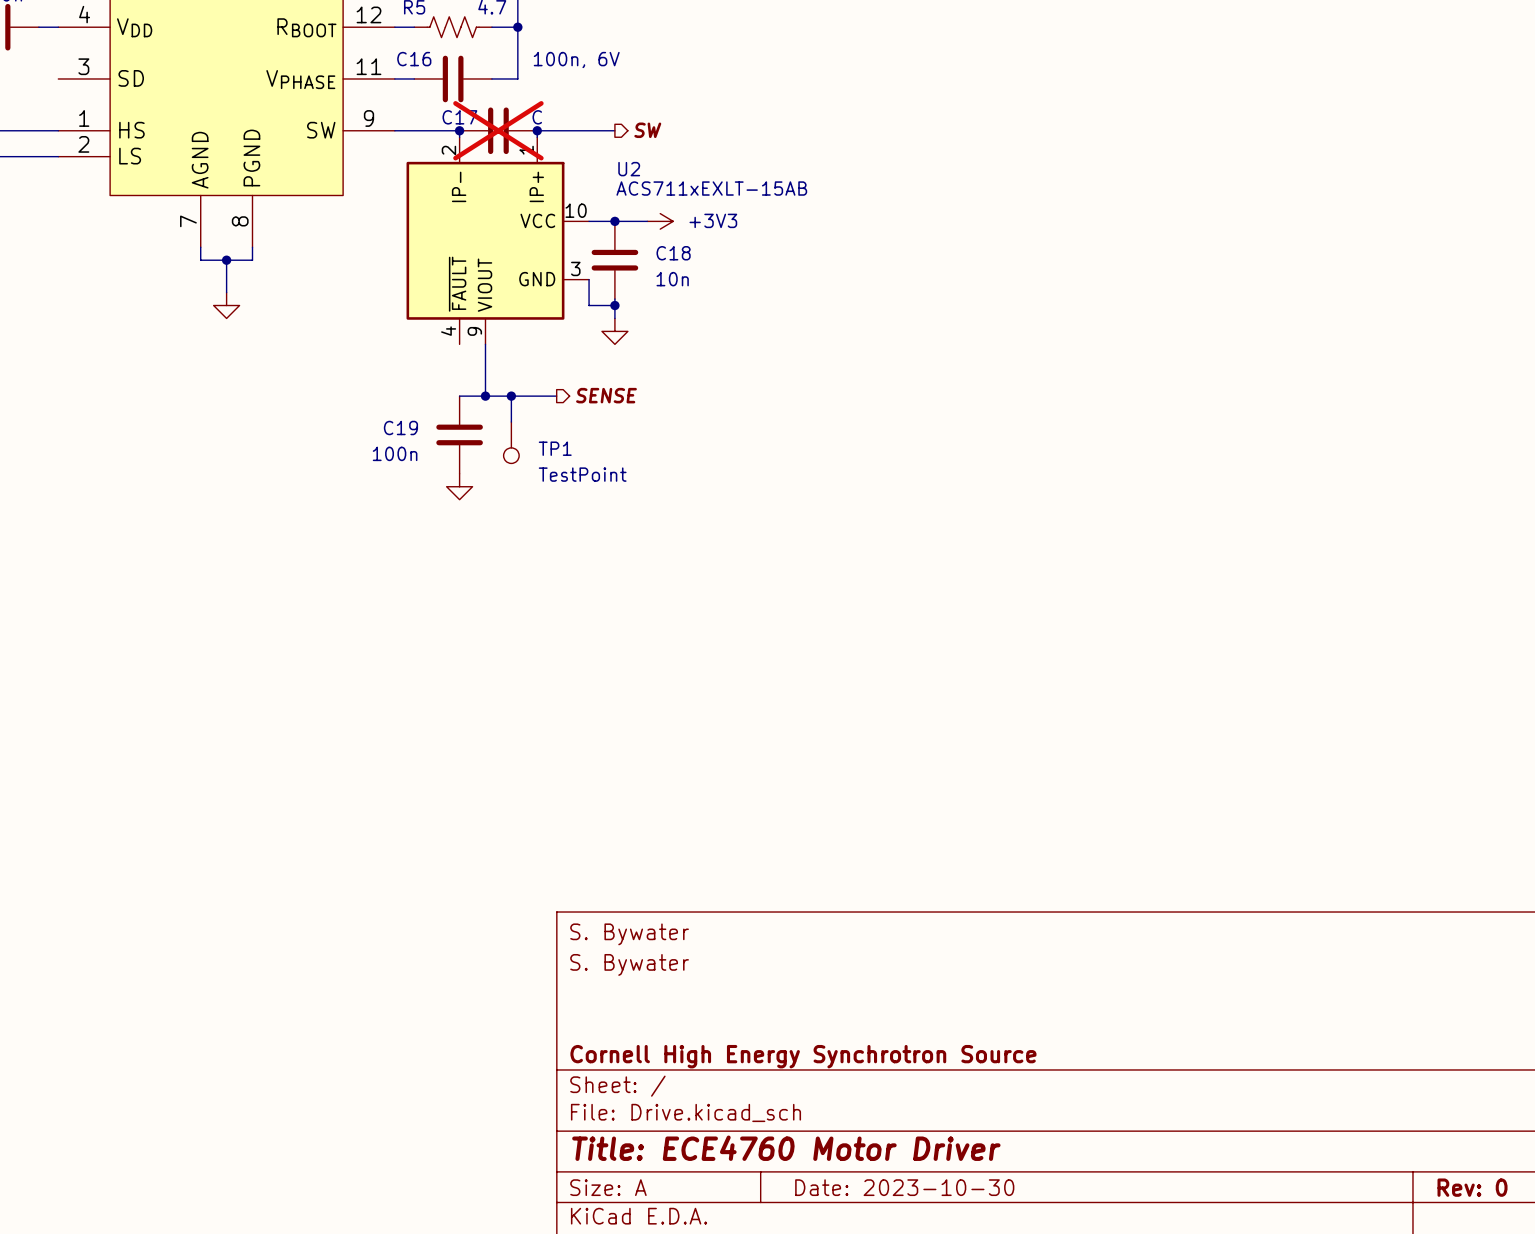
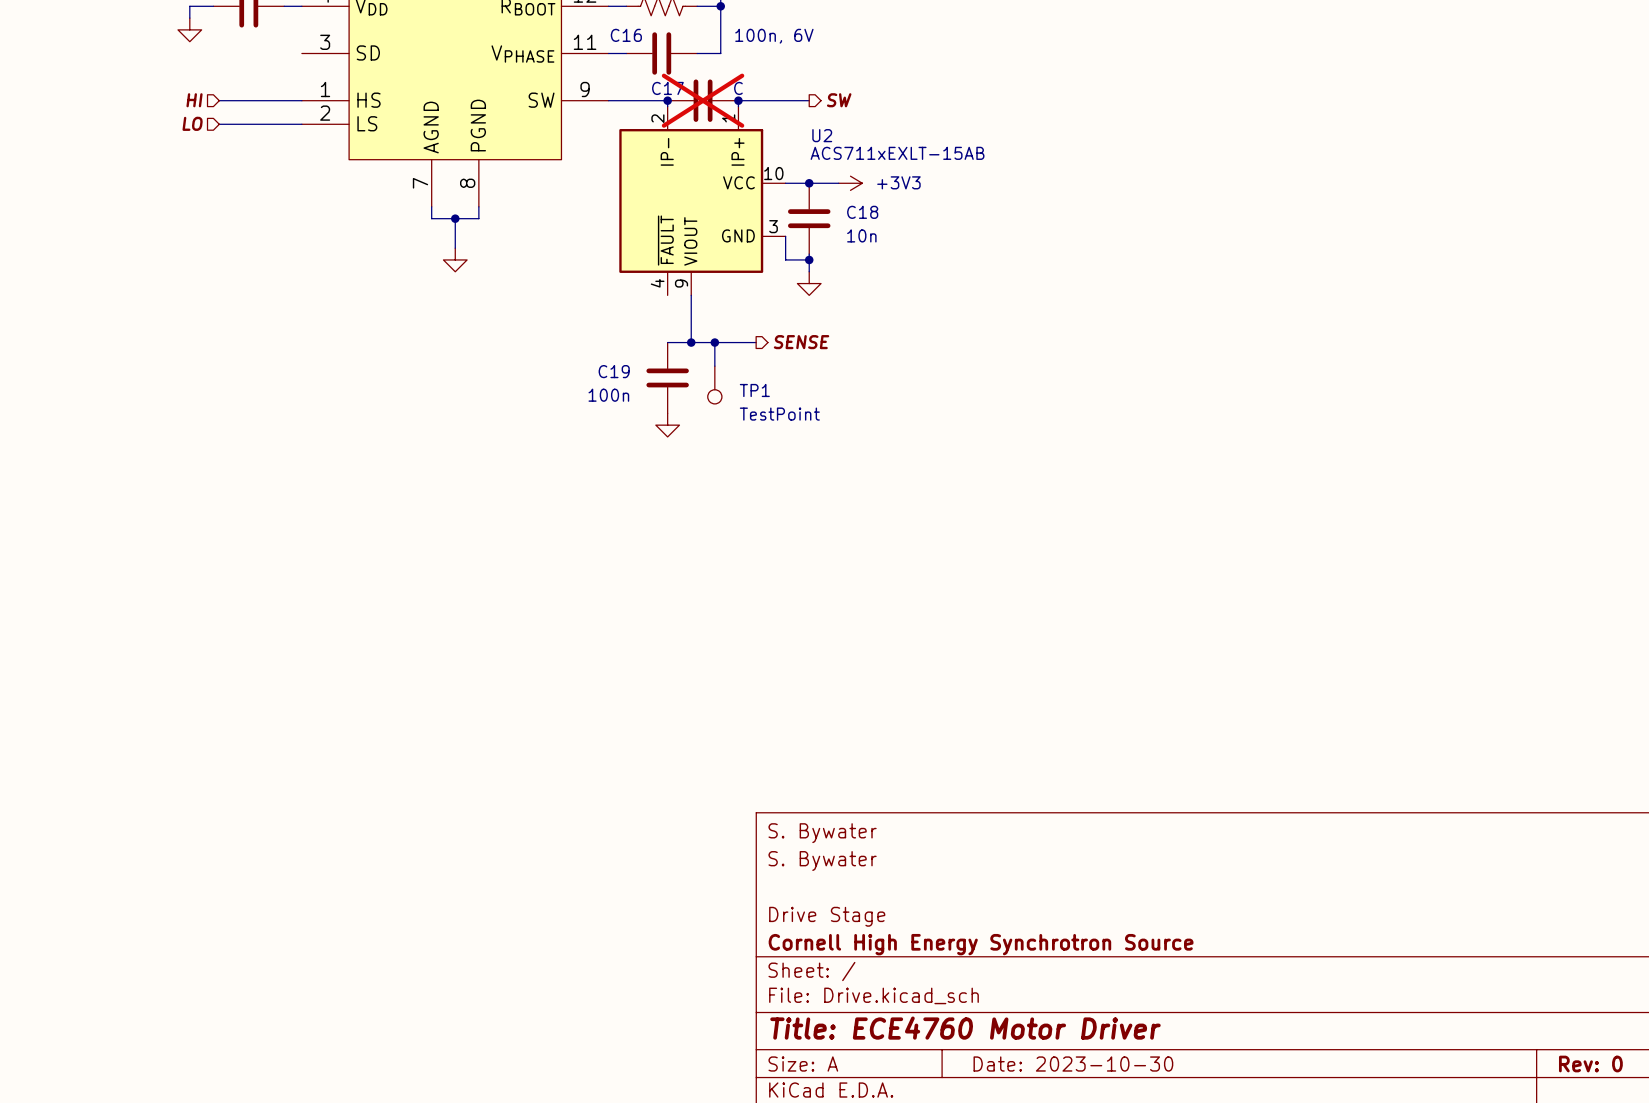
title block: none -> Drive Stage (827, 916)

